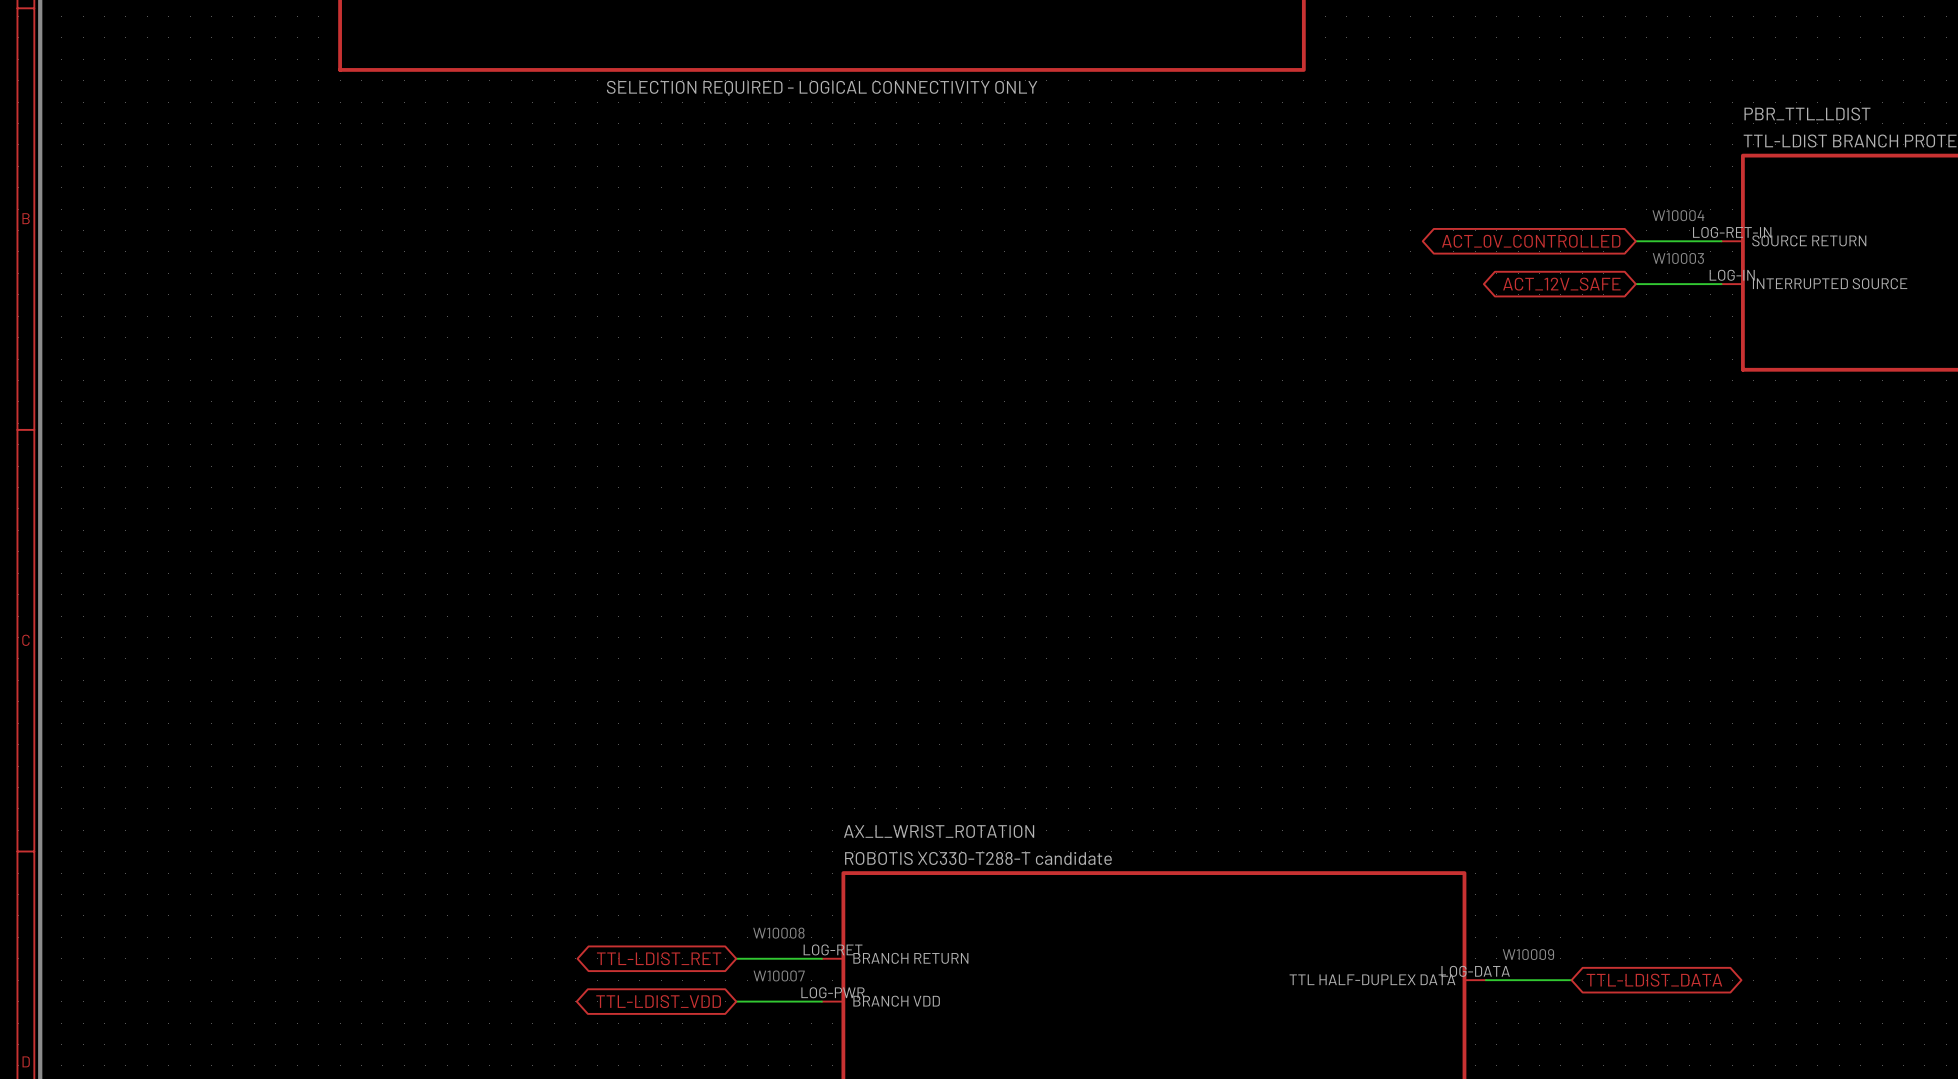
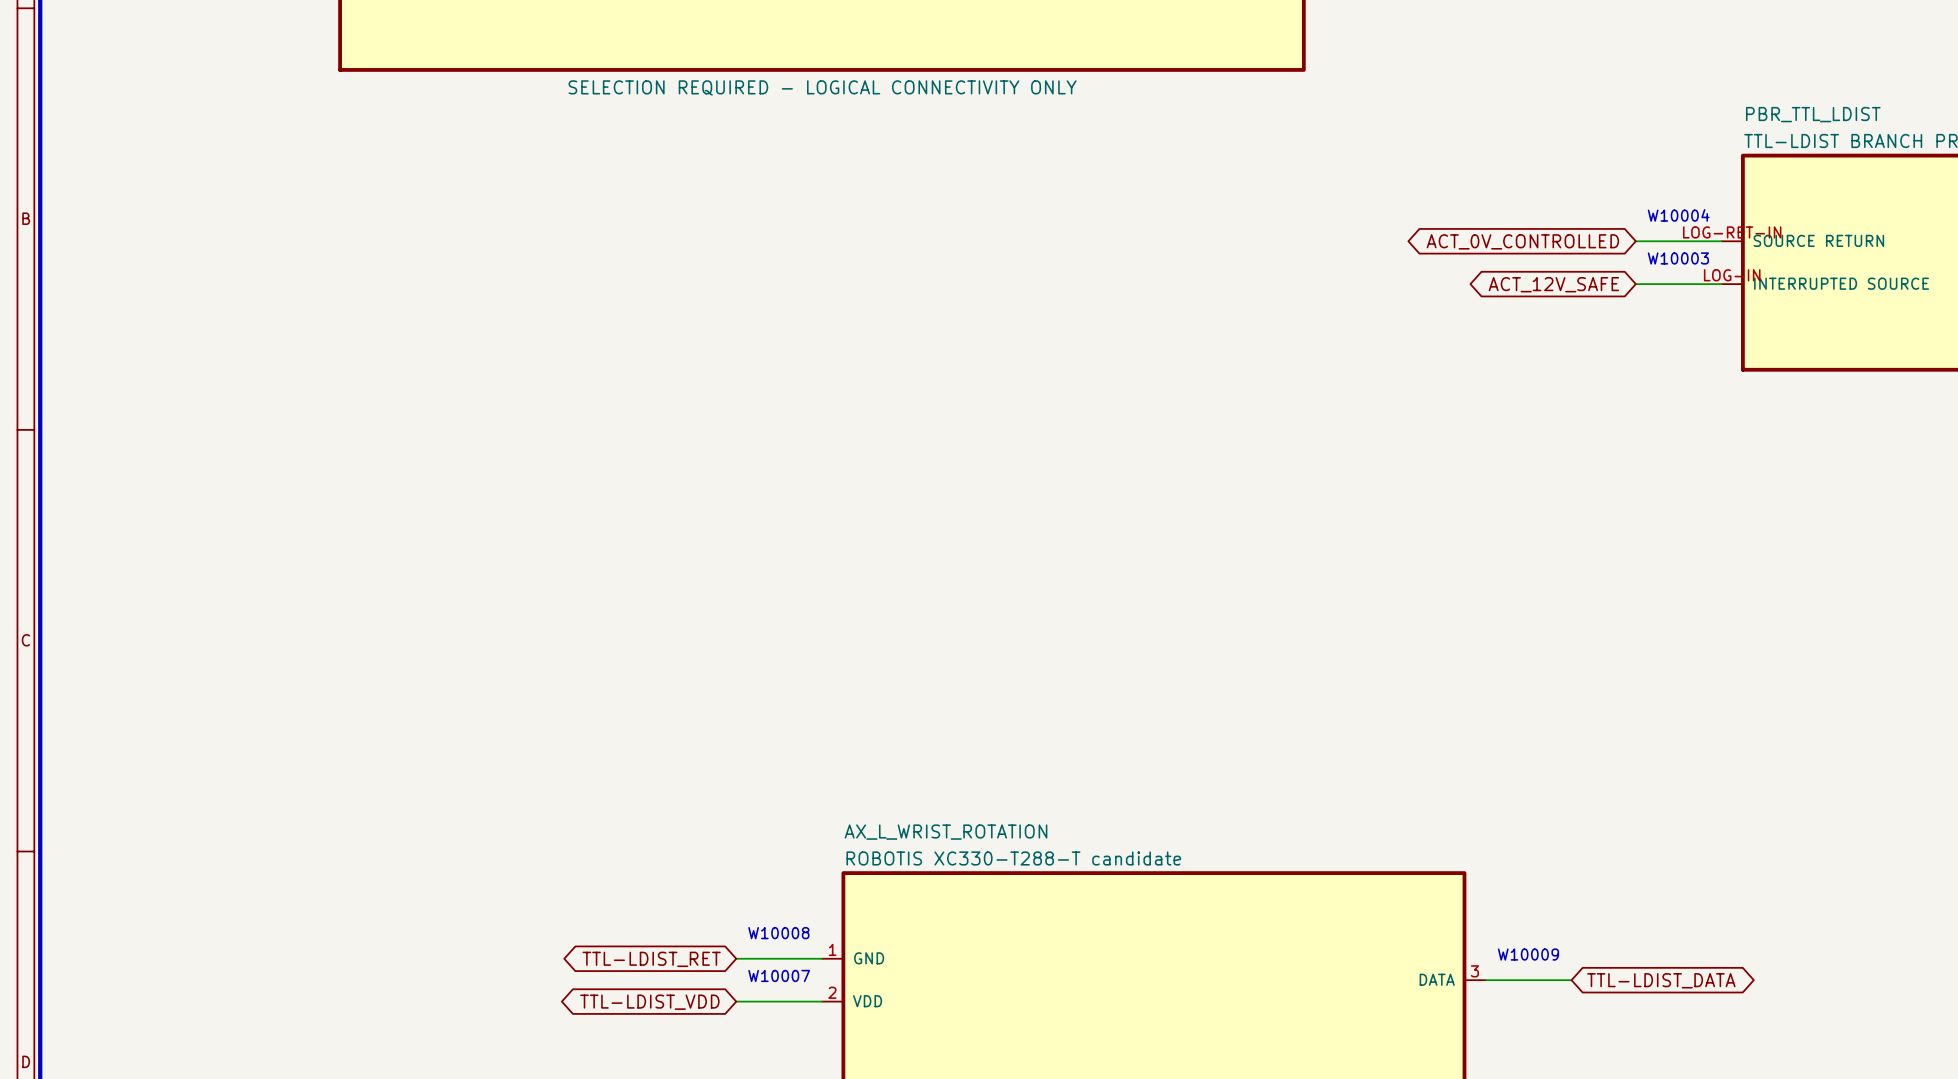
AX_L_WRIST_ROTATION pin number: LOG-RET (833, 949) -> 1 (832, 949)
AX_L_WRIST_ROTATION pin name: BRANCH RETURN (910, 958) -> GND (869, 958)
AX_L_WRIST_ROTATION pin number: LOG-DATA (1475, 971) -> 3 (1474, 971)
AX_L_WRIST_ROTATION pin name: TTL HALF-DUPLEX DATA (1372, 979) -> DATA (1437, 979)
AX_L_WRIST_ROTATION pin number: LOG-PWR (833, 992) -> 2 (832, 992)
AX_L_WRIST_ROTATION pin name: BRANCH VDD (896, 1001) -> VDD (867, 1001)

